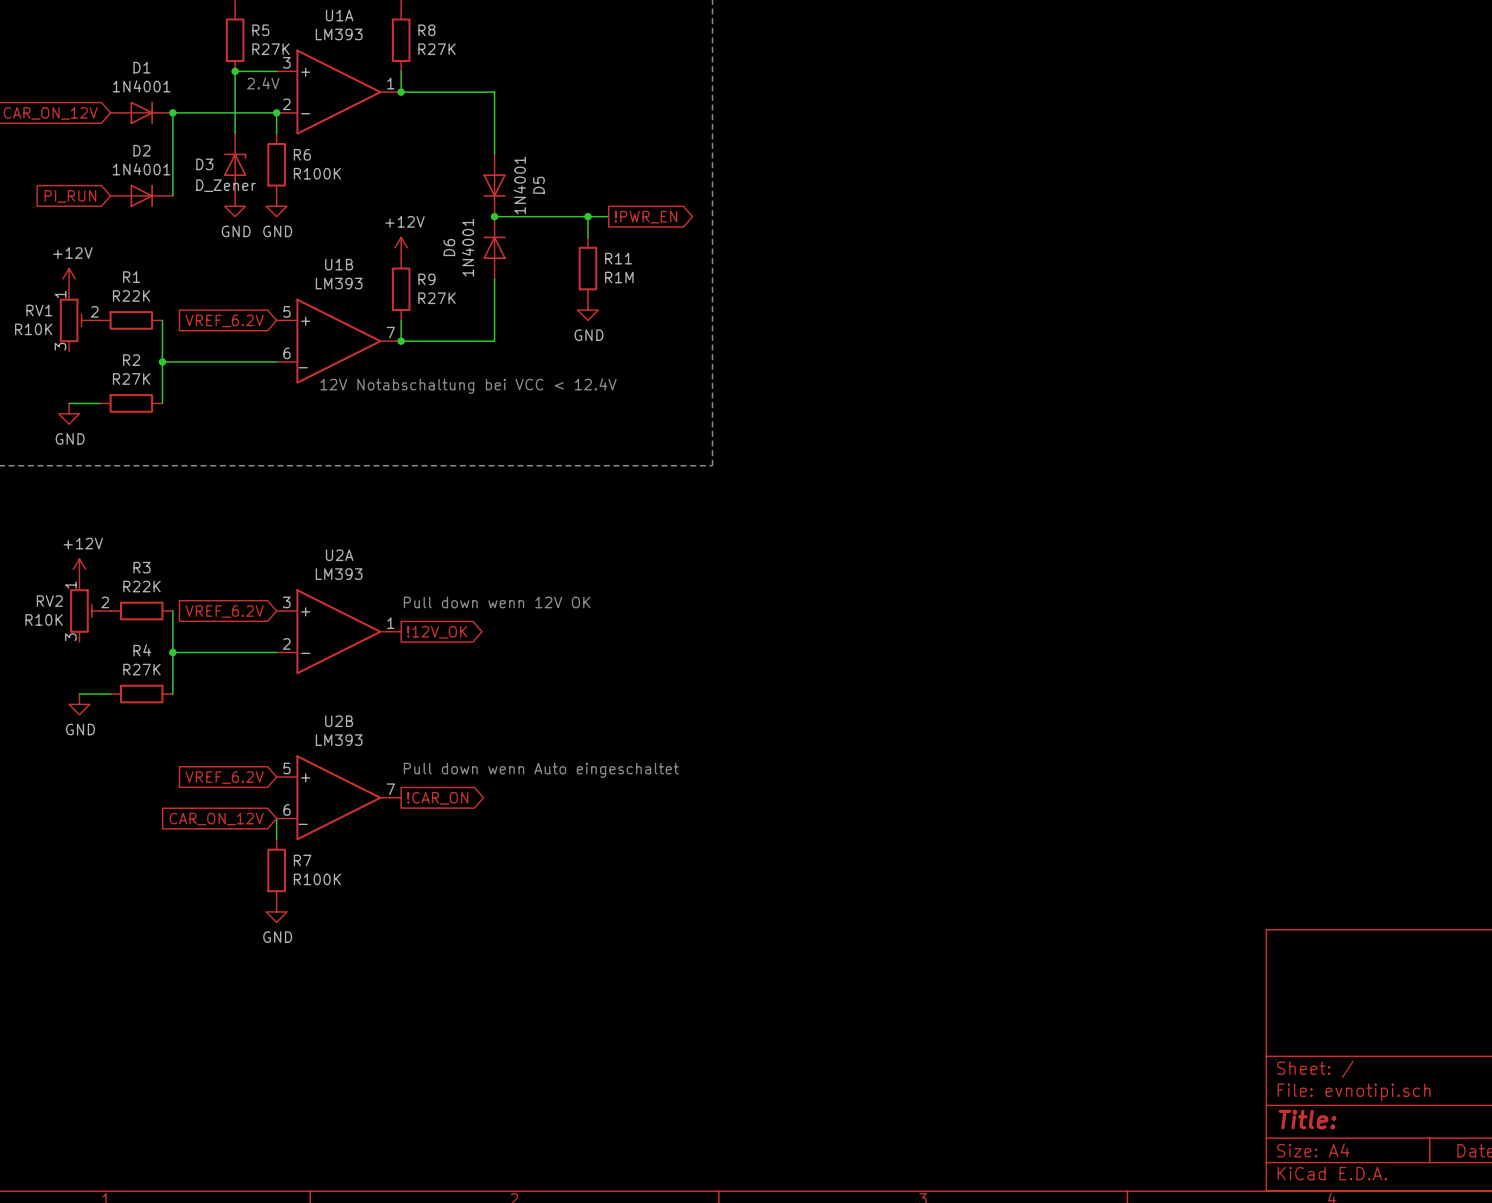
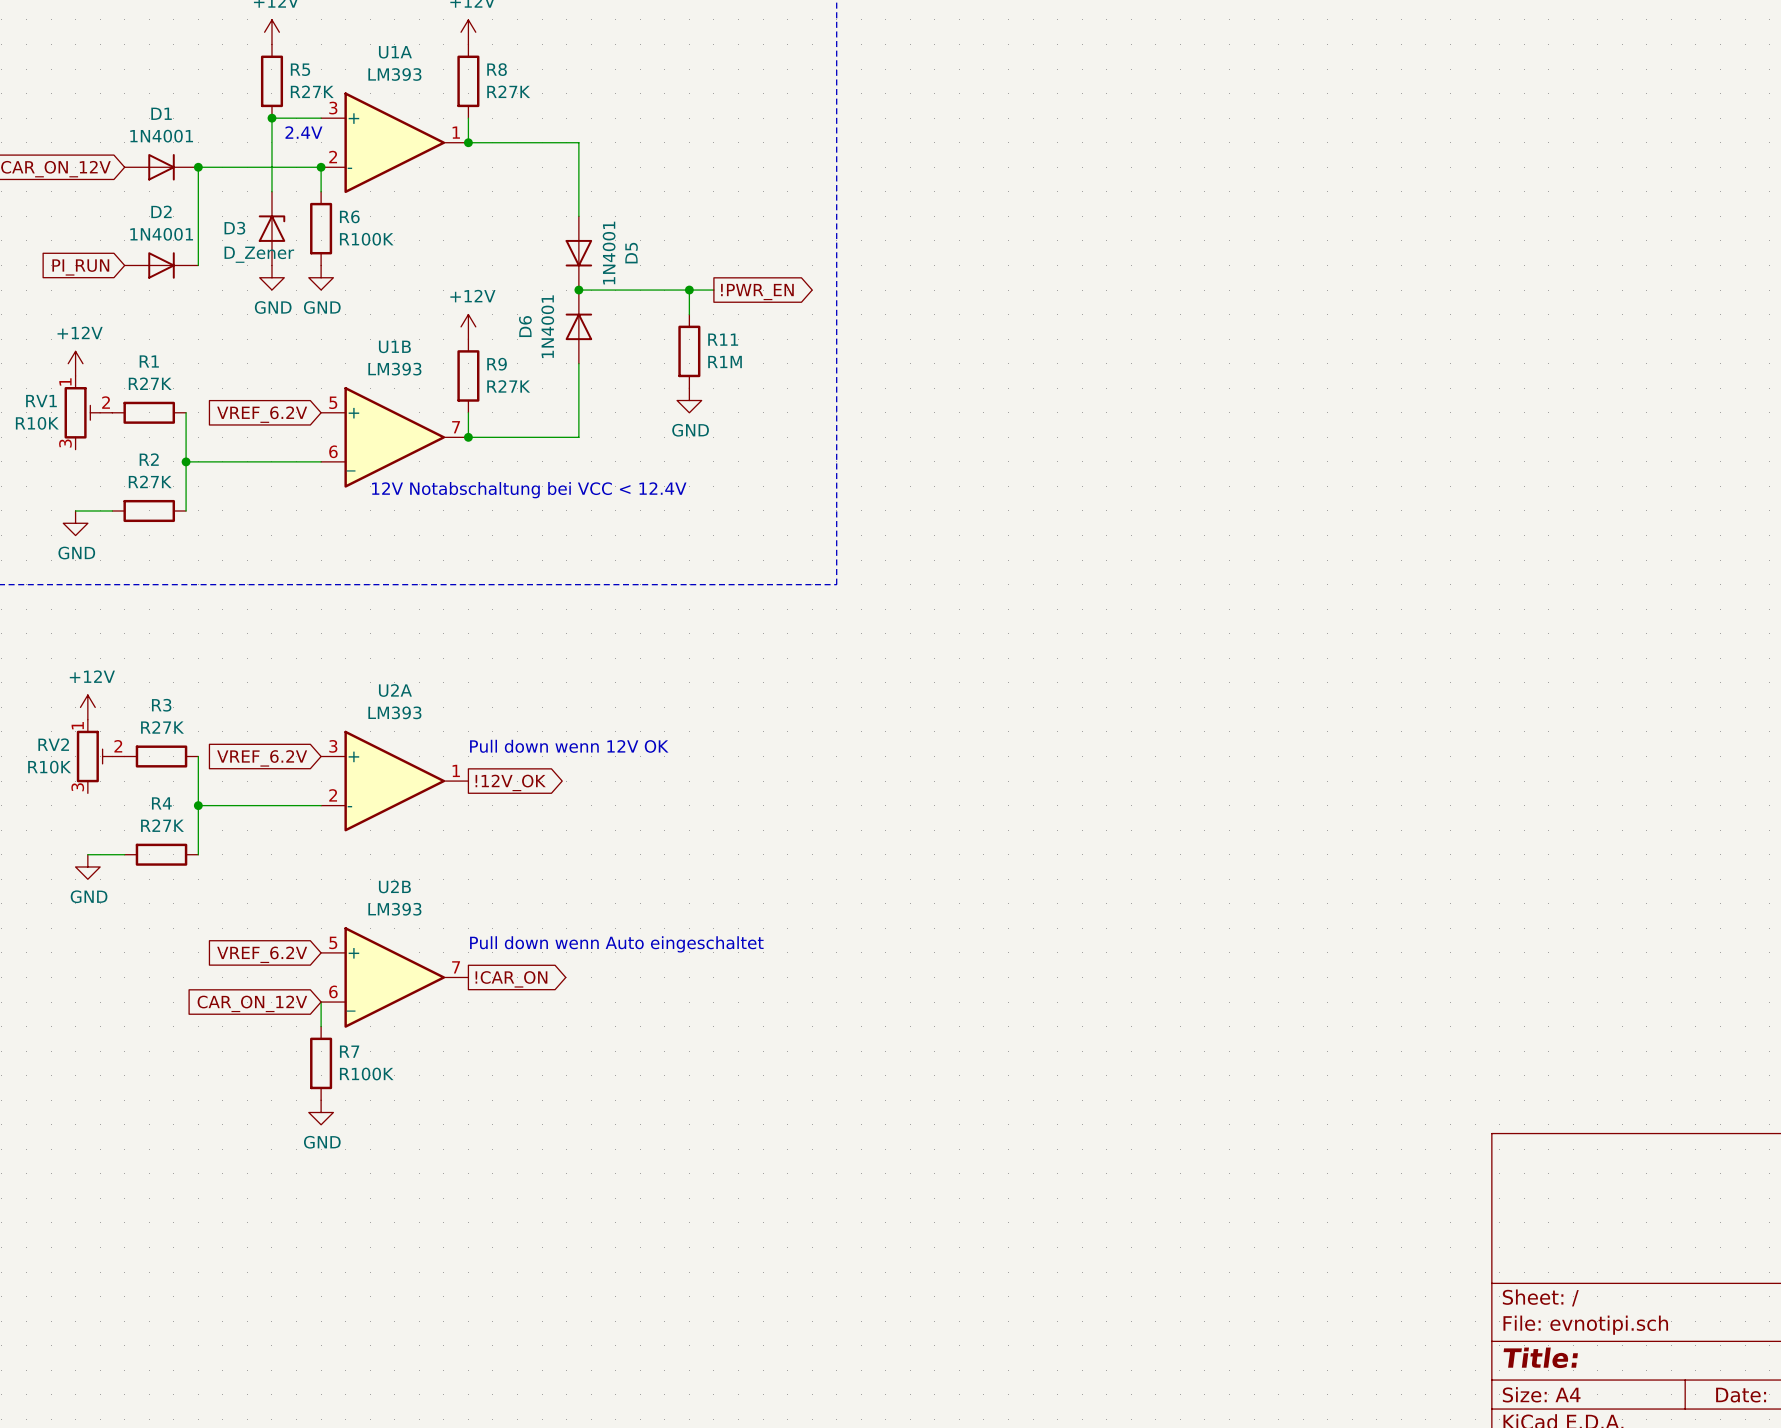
R1 value: R22K (131, 295) -> R27K (150, 383)
R3 value: R22K (141, 586) -> R27K (162, 727)

